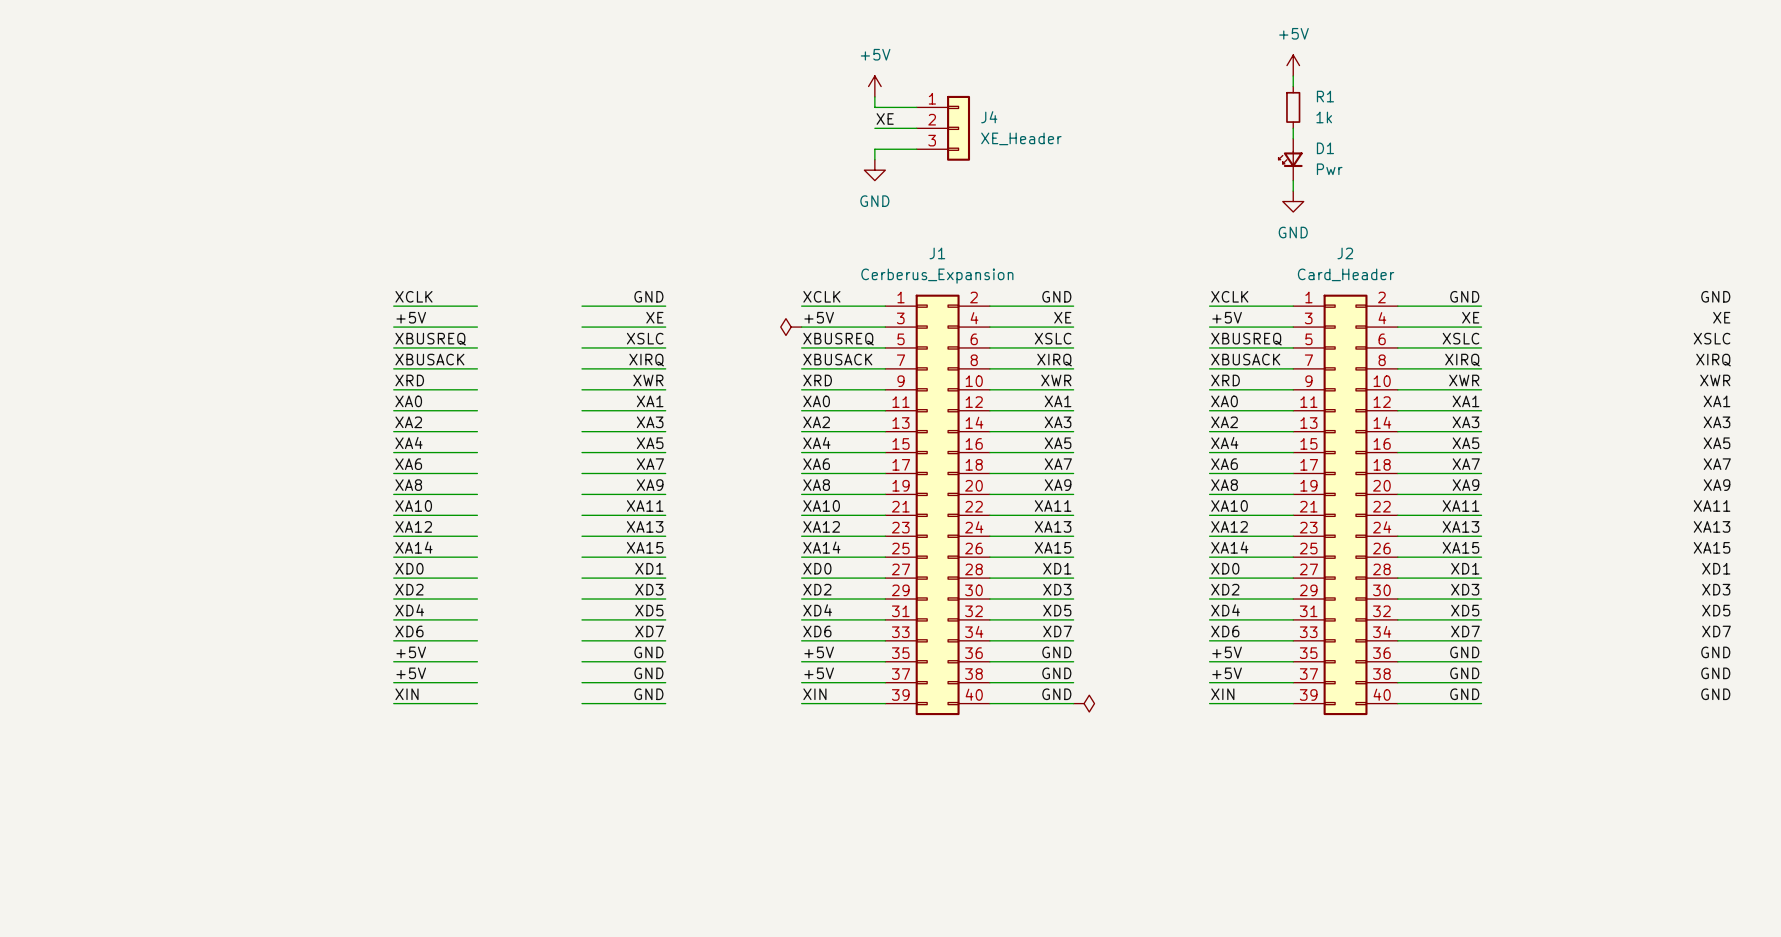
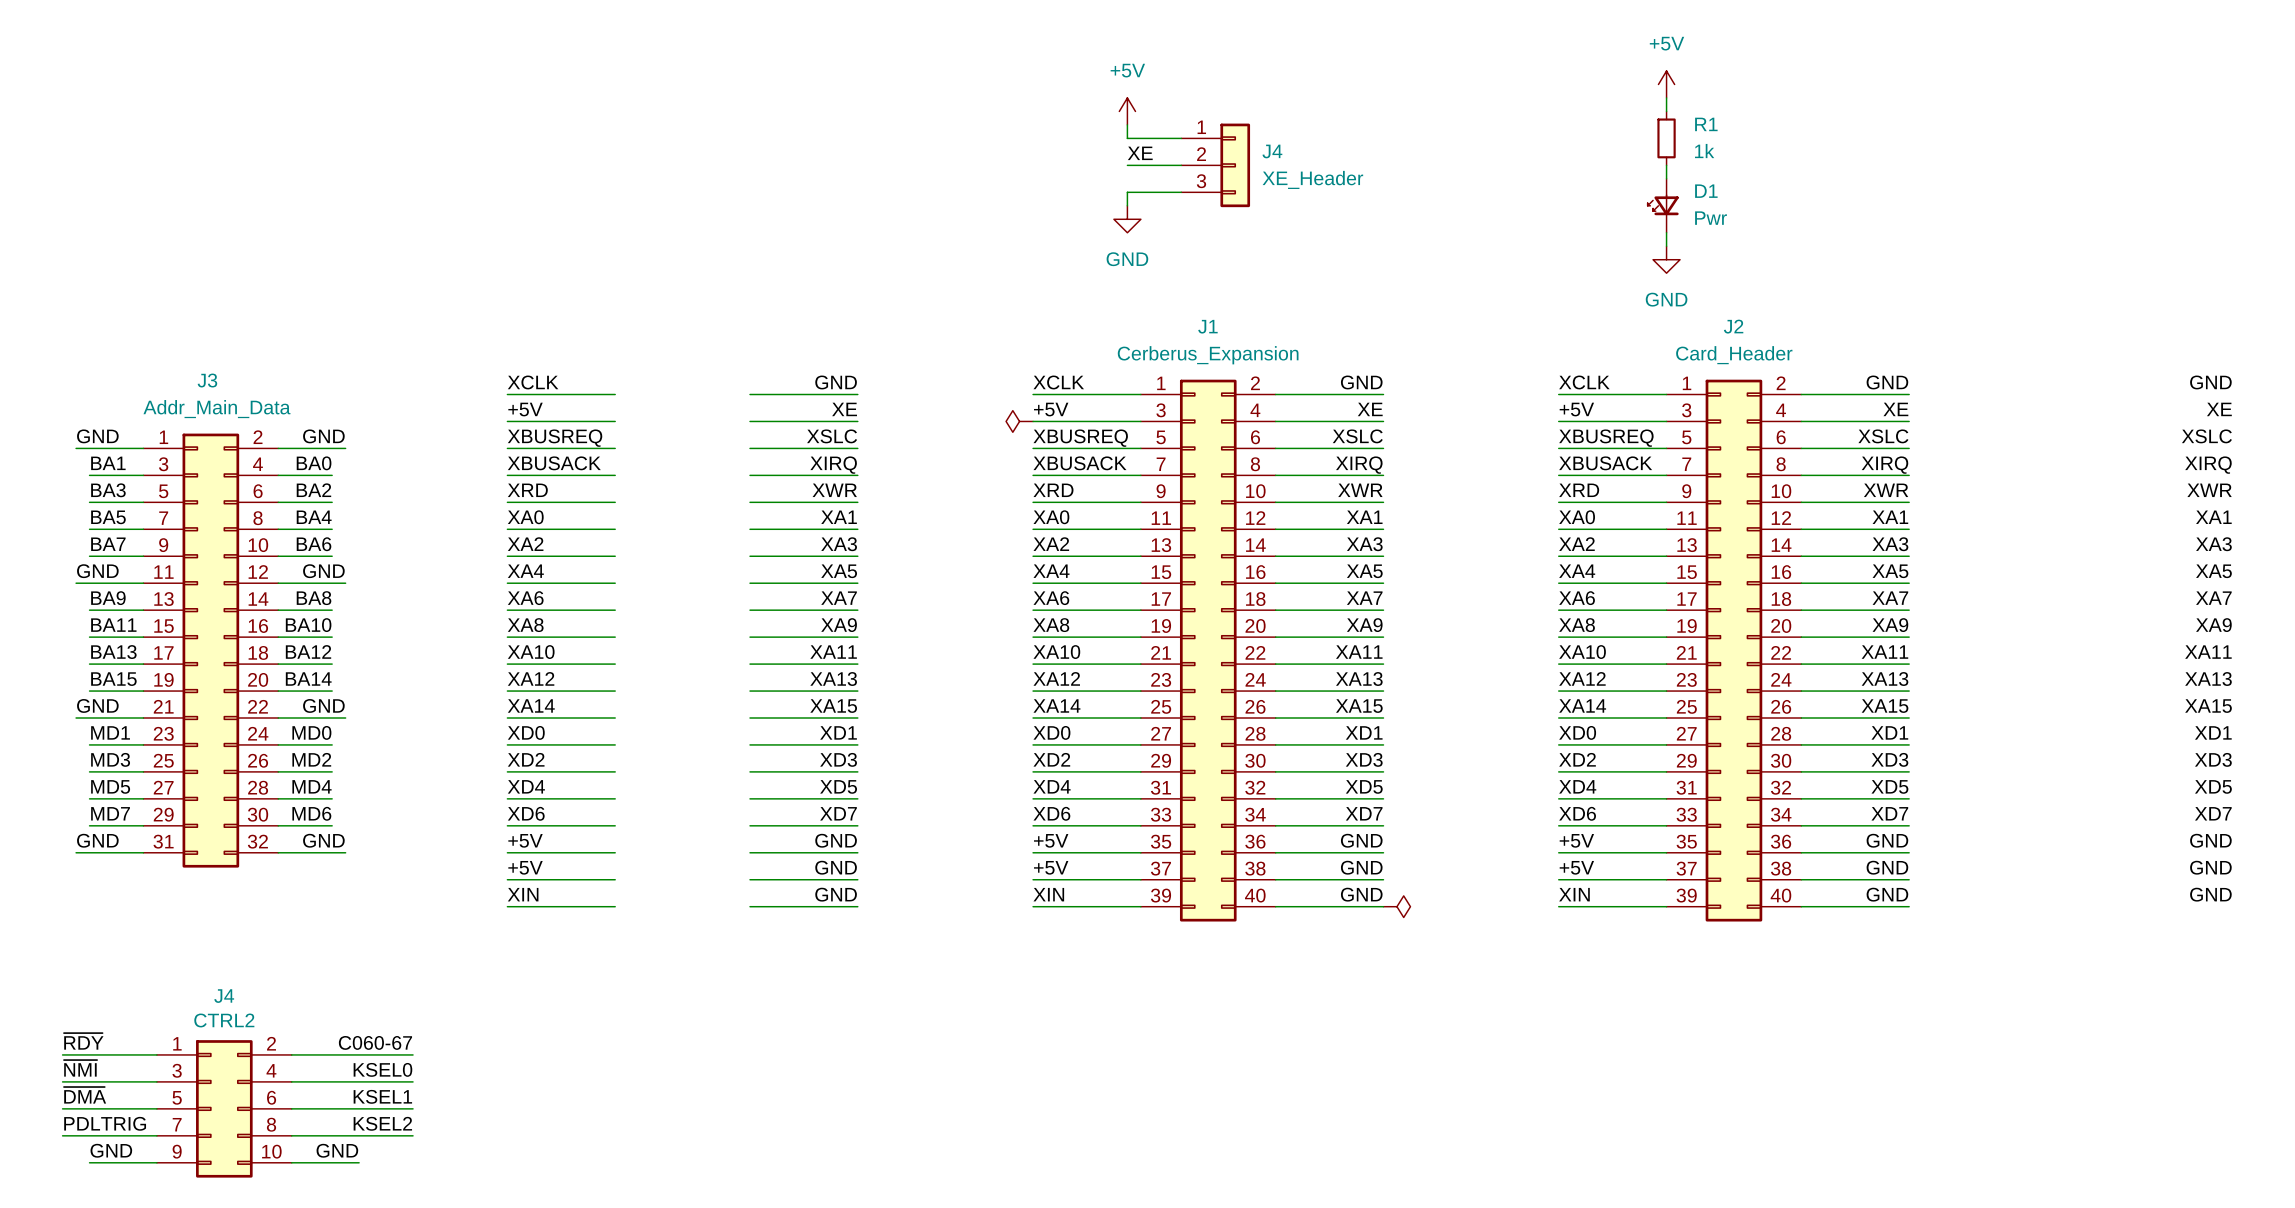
label: none -> GND (97, 436)
label: none -> GND (323, 436)
wire: none -> (76, 448) (143, 448)
wire: none -> (278, 448) (345, 448)
label: none -> BA1 (108, 463)
label: none -> BA0 (314, 463)
wire: none -> (89, 475) (143, 475)
wire: none -> (278, 475) (332, 475)
label: none -> BA3 (108, 490)
label: none -> BA2 (313, 490)
wire: none -> (89, 502) (143, 502)
wire: none -> (278, 502) (332, 502)
label: none -> BA5 (108, 517)
label: none -> BA4 (314, 517)
wire: none -> (89, 529) (143, 529)
wire: none -> (278, 529) (332, 529)
label: none -> BA7 (108, 544)
label: none -> BA6 (314, 544)
wire: none -> (89, 556) (143, 556)
wire: none -> (278, 556) (332, 556)
label: none -> GND (97, 571)
label: none -> GND (323, 571)
wire: none -> (76, 583) (143, 583)
wire: none -> (278, 583) (345, 583)
label: none -> BA9 (108, 598)
label: none -> BA8 (314, 598)
wire: none -> (89, 610) (143, 610)
wire: none -> (278, 610) (332, 610)
label: none -> BA11 (113, 625)
label: none -> BA10 (308, 625)
wire: none -> (89, 637) (143, 637)
wire: none -> (278, 637) (332, 637)
J3: none -> Addr_Main_Data (210, 650)
label: none -> BA13 (113, 652)
label: none -> BA12 (308, 651)
wire: none -> (89, 664) (143, 664)
wire: none -> (278, 664) (332, 664)
label: none -> BA15 (113, 679)
label: none -> BA14 (308, 679)
wire: none -> (89, 691) (143, 691)
wire: none -> (278, 691) (332, 691)
label: none -> GND (97, 705)
label: none -> GND (323, 705)
wire: none -> (76, 717) (143, 717)
wire: none -> (278, 717) (345, 717)
label: none -> MD1 (110, 732)
label: none -> MD0 (311, 732)
wire: none -> (89, 744) (143, 744)
wire: none -> (278, 744) (332, 744)
label: none -> MD3 (110, 759)
label: none -> MD2 (311, 759)
wire: none -> (89, 771) (143, 771)
wire: none -> (278, 771) (332, 771)
label: none -> MD5 (110, 786)
label: none -> MD4 (311, 786)
wire: none -> (89, 798) (143, 798)
wire: none -> (278, 798) (332, 798)
label: none -> MD7 (110, 813)
label: none -> MD6 (311, 813)
wire: none -> (89, 825) (143, 825)
wire: none -> (278, 825) (332, 825)
label: none -> GND (97, 840)
label: none -> GND (323, 840)
wire: none -> (76, 852) (143, 852)
wire: none -> (278, 852) (345, 852)
label: none -> ~{RDY} (83, 1041)
label: none -> C060-67 (375, 1042)
wire: none -> (62, 1054) (156, 1054)
wire: none -> (291, 1054) (413, 1054)
label: none -> ~{NMI} (80, 1068)
label: none -> KSEL0 (382, 1069)
wire: none -> (62, 1081) (156, 1081)
wire: none -> (291, 1081) (413, 1081)
label: none -> ~{DMA} (85, 1095)
label: none -> KSEL1 (382, 1096)
wire: none -> (62, 1108) (156, 1108)
J4: none -> CTRL2 (224, 1108)
wire: none -> (291, 1108) (413, 1108)
label: none -> PDLTRIG (105, 1123)
label: none -> KSEL2 (382, 1123)
wire: none -> (62, 1135) (156, 1135)
wire: none -> (291, 1135) (413, 1135)
label: none -> GND (111, 1150)
label: none -> GND (337, 1150)
wire: none -> (89, 1162) (156, 1162)
wire: none -> (291, 1162) (359, 1162)

